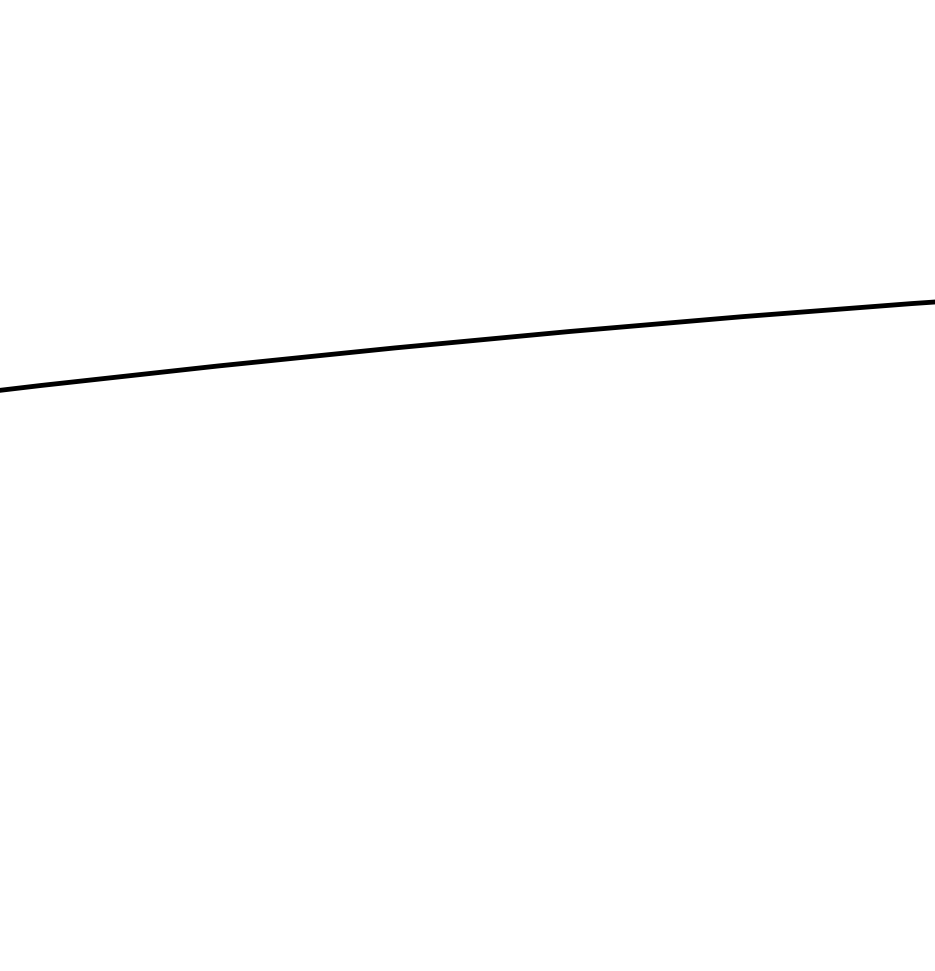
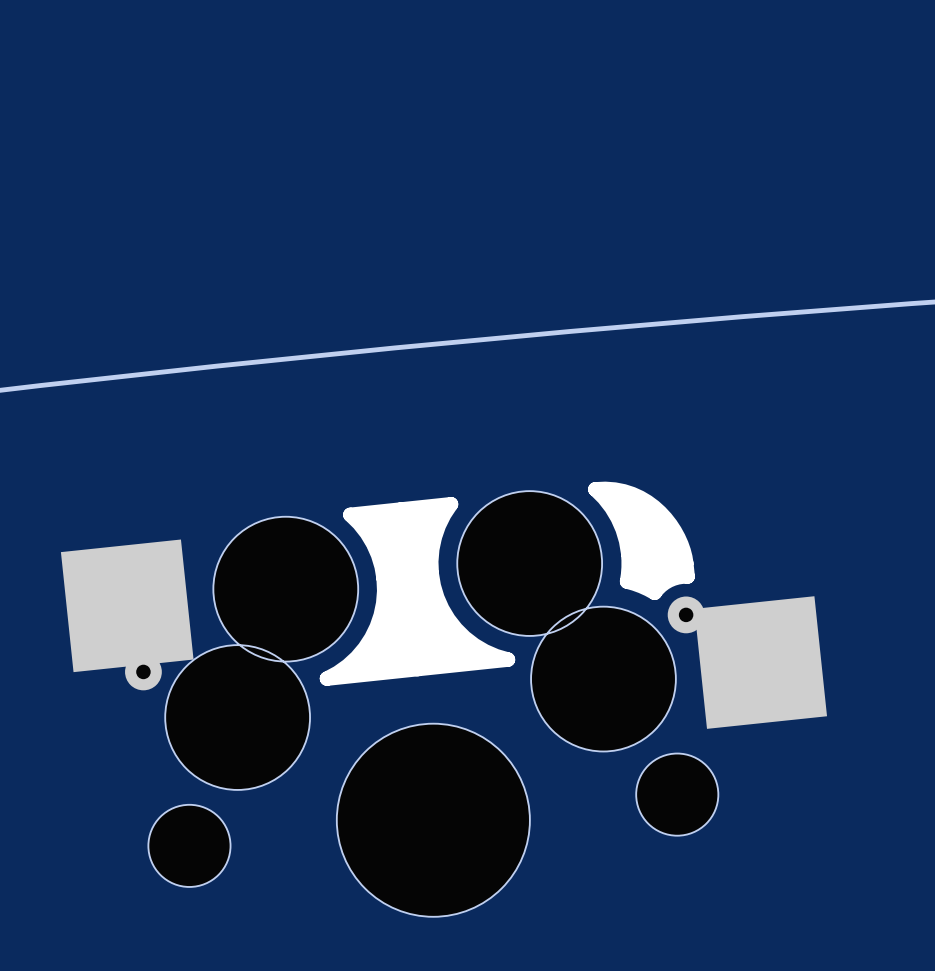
part: none -> (443, 699)

